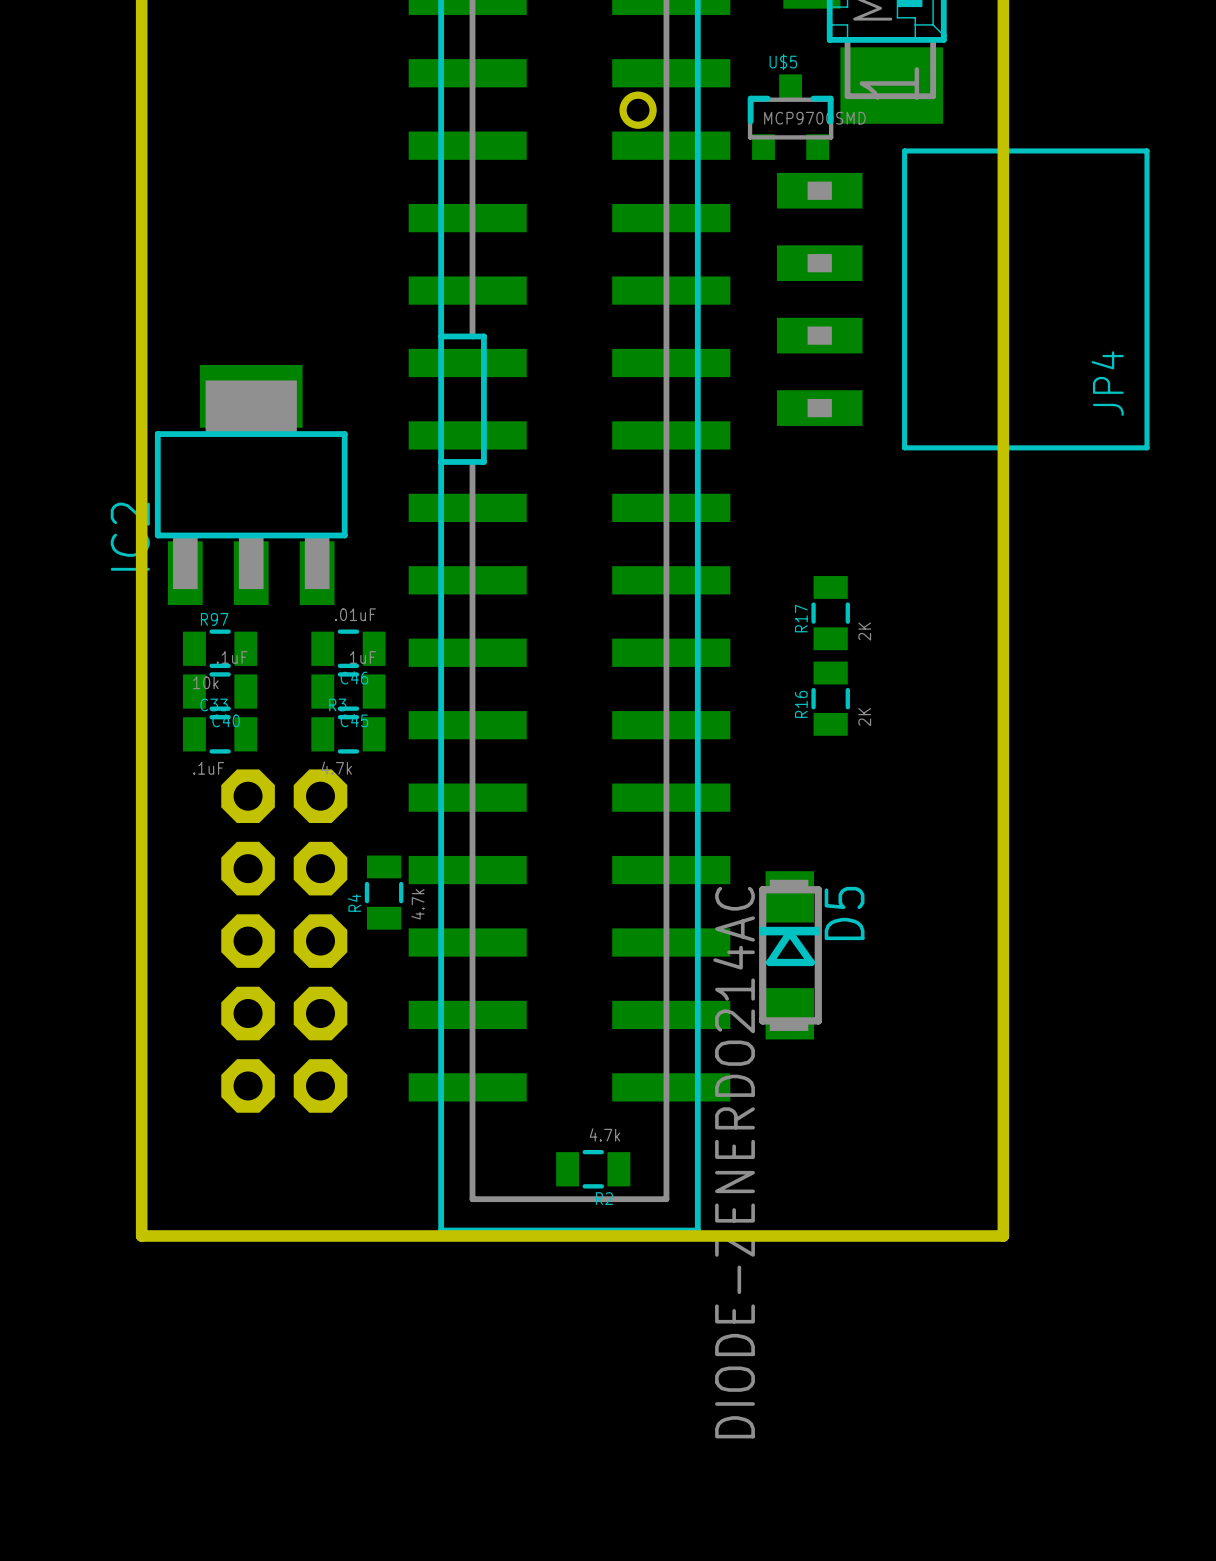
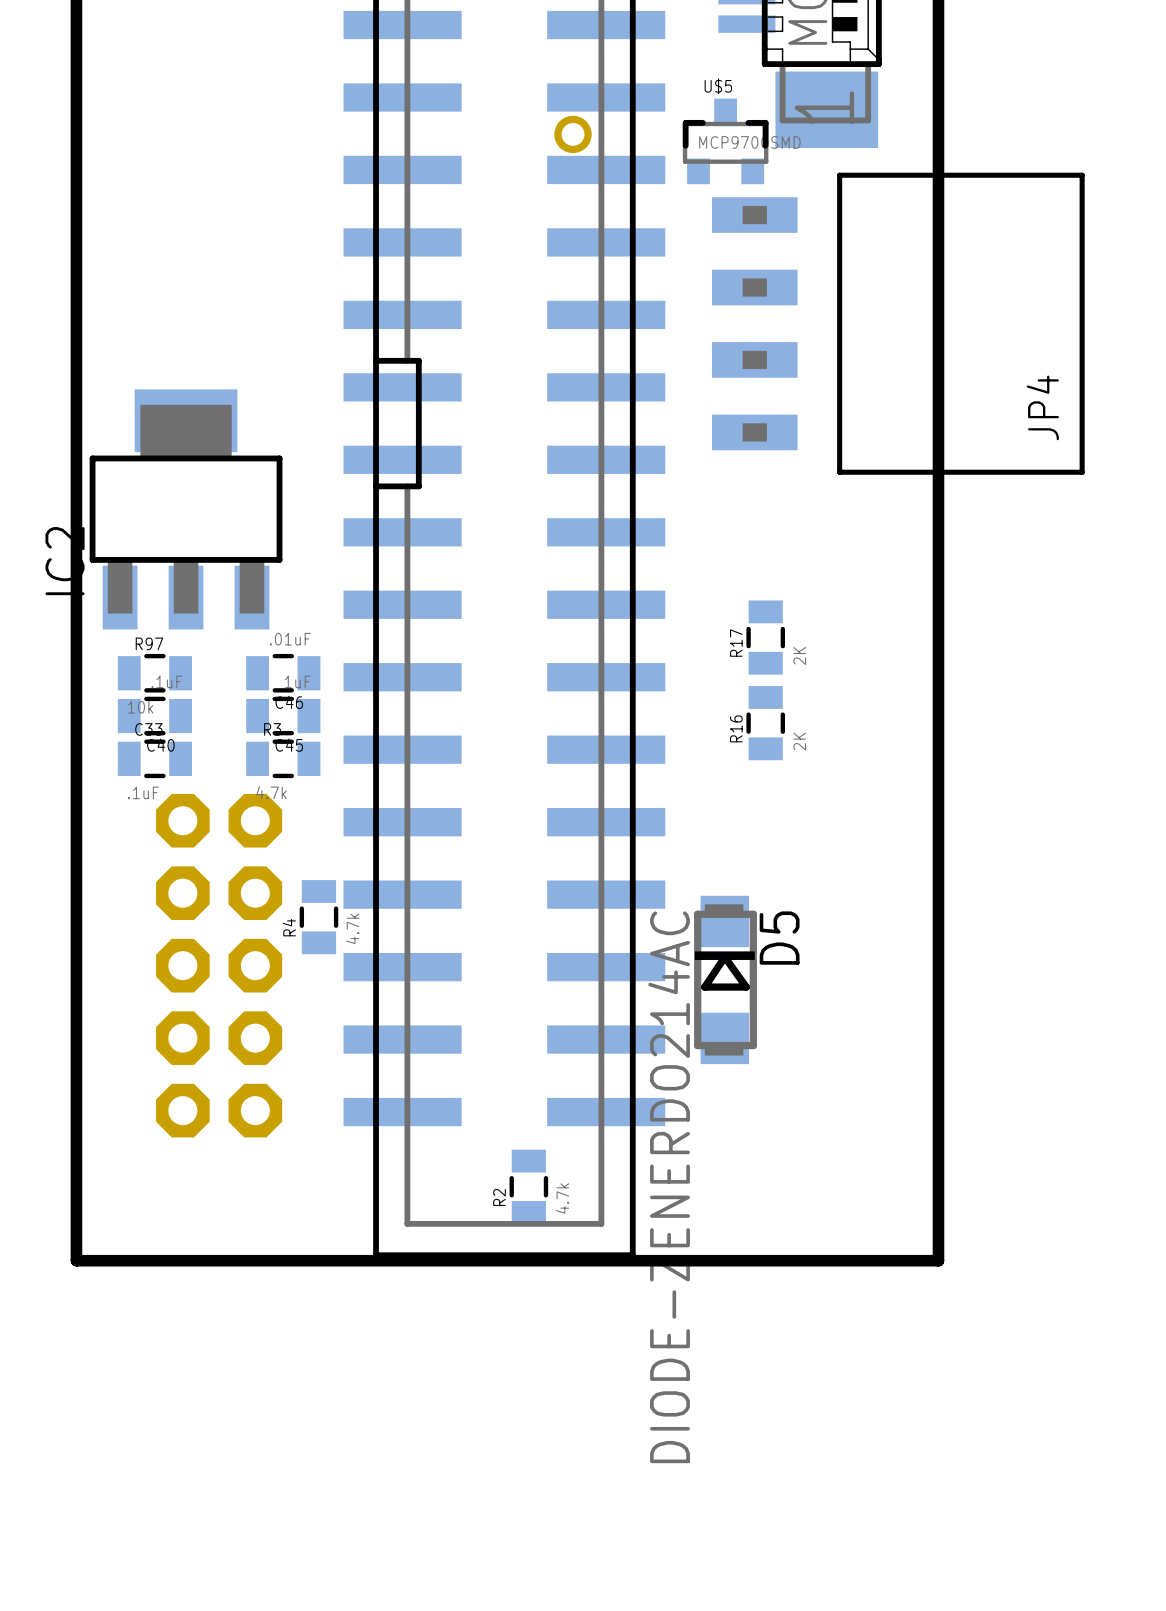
R2 rotation: 0° (593, 1169) -> 90° clockwise (528, 1186)

